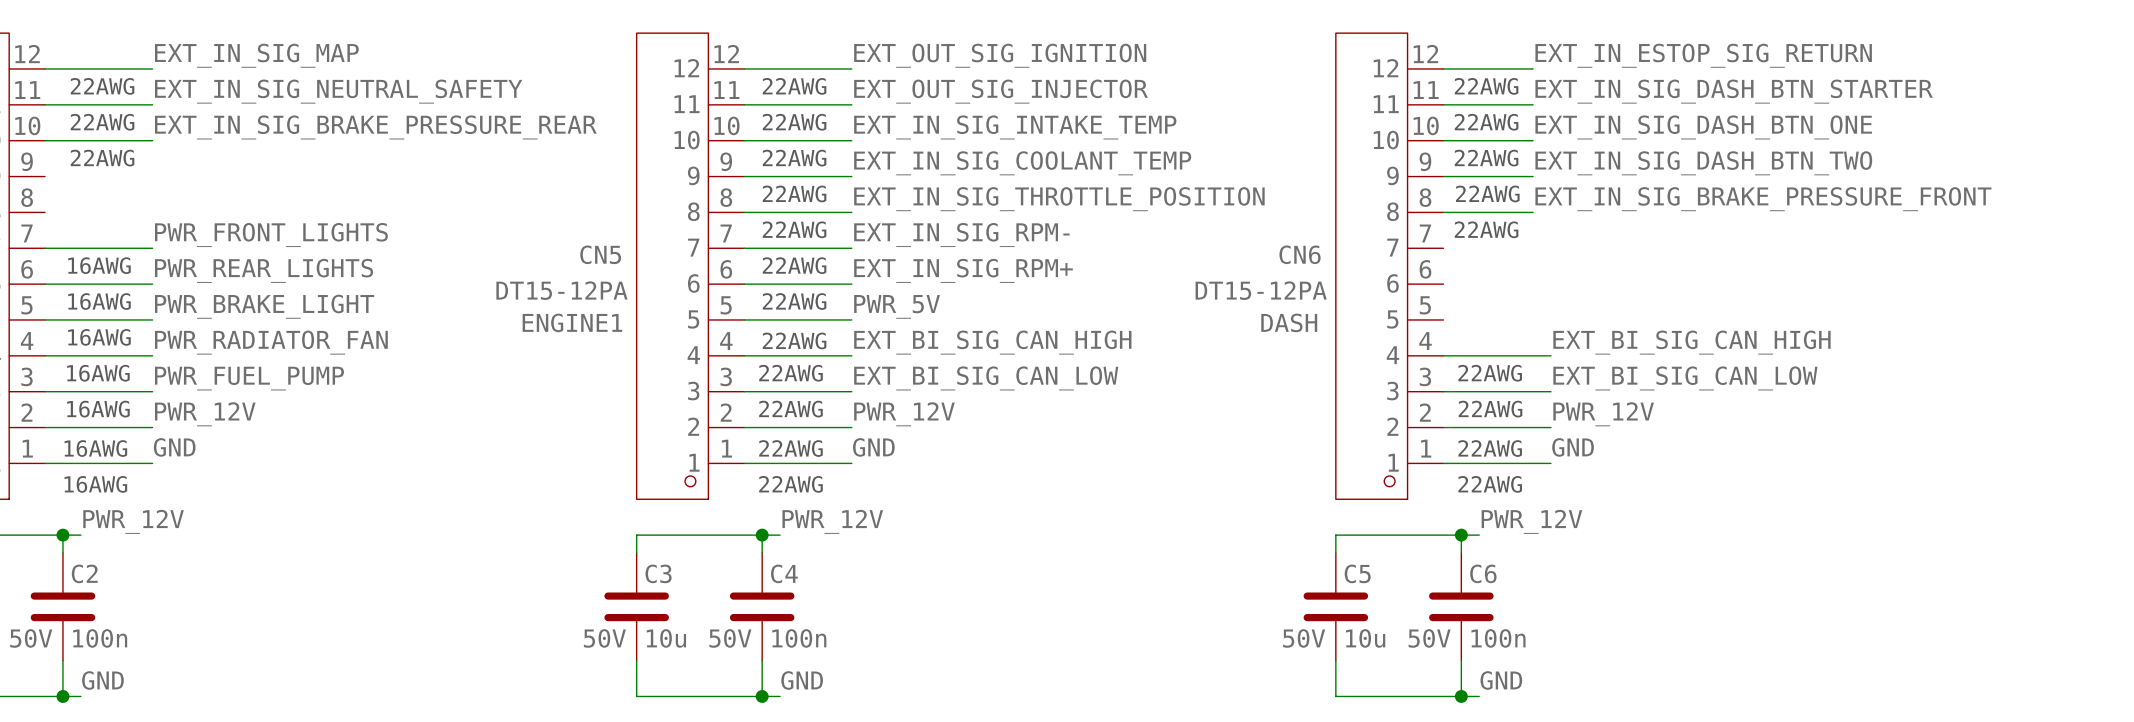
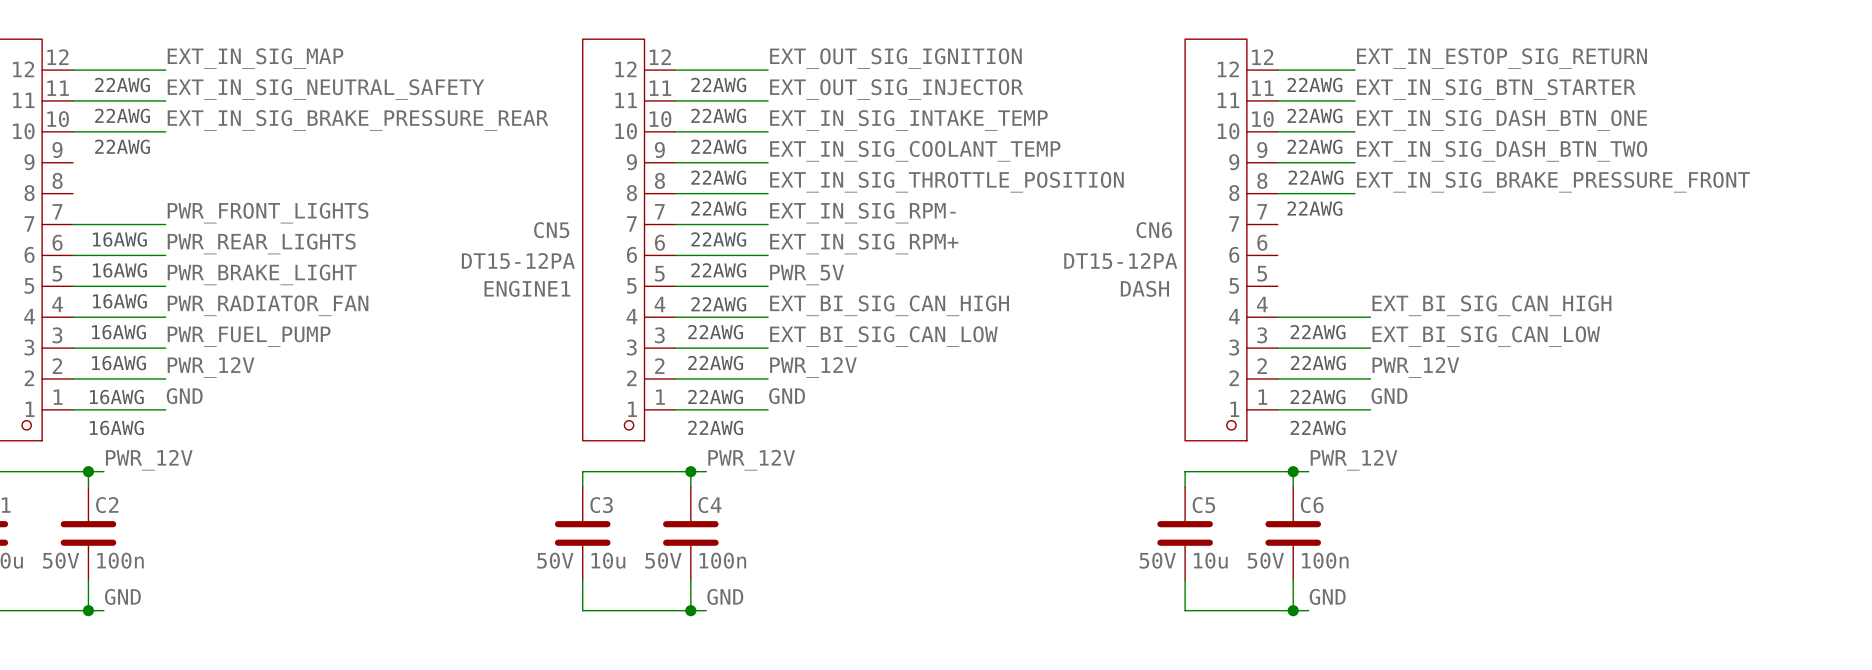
label: EXT_IN_SIG_DASH_BTN_STARTER (1734, 91) -> EXT_IN_SIG_BTN_STARTER (1496, 89)

